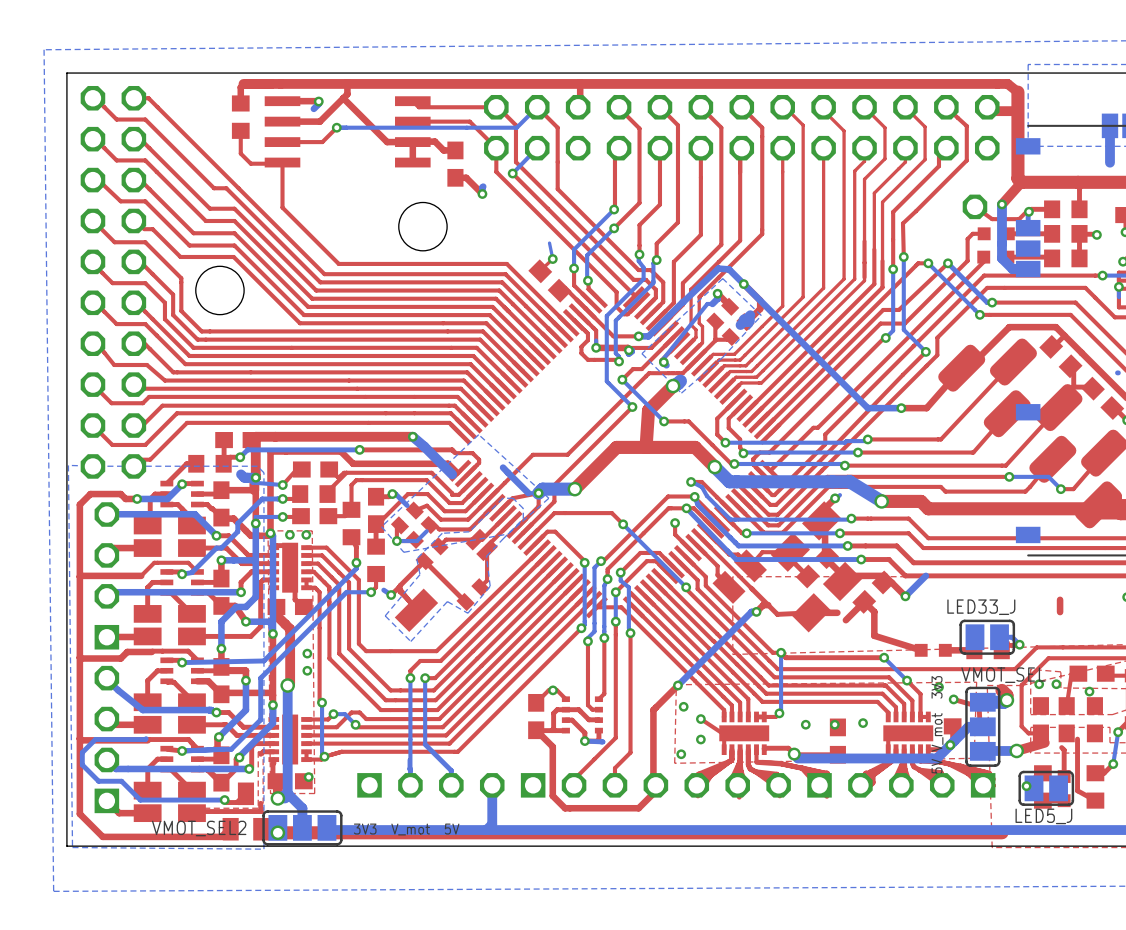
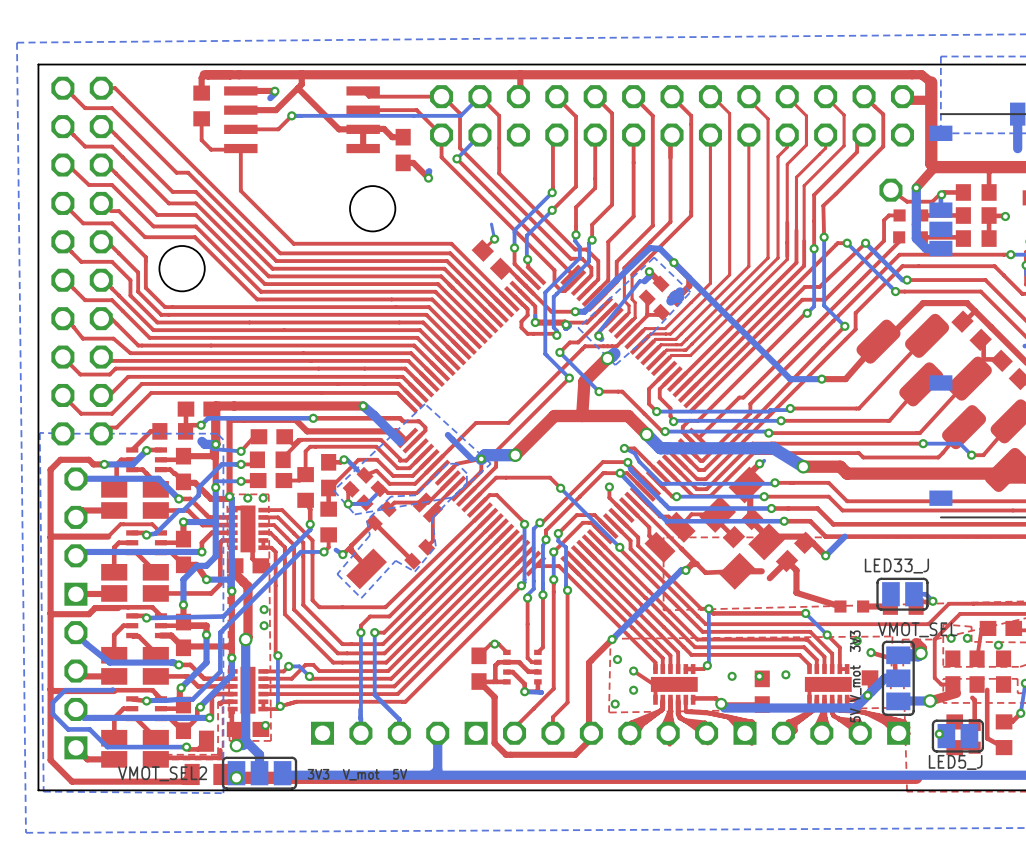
top track: (1060, 599) (1060, 612) -> none

